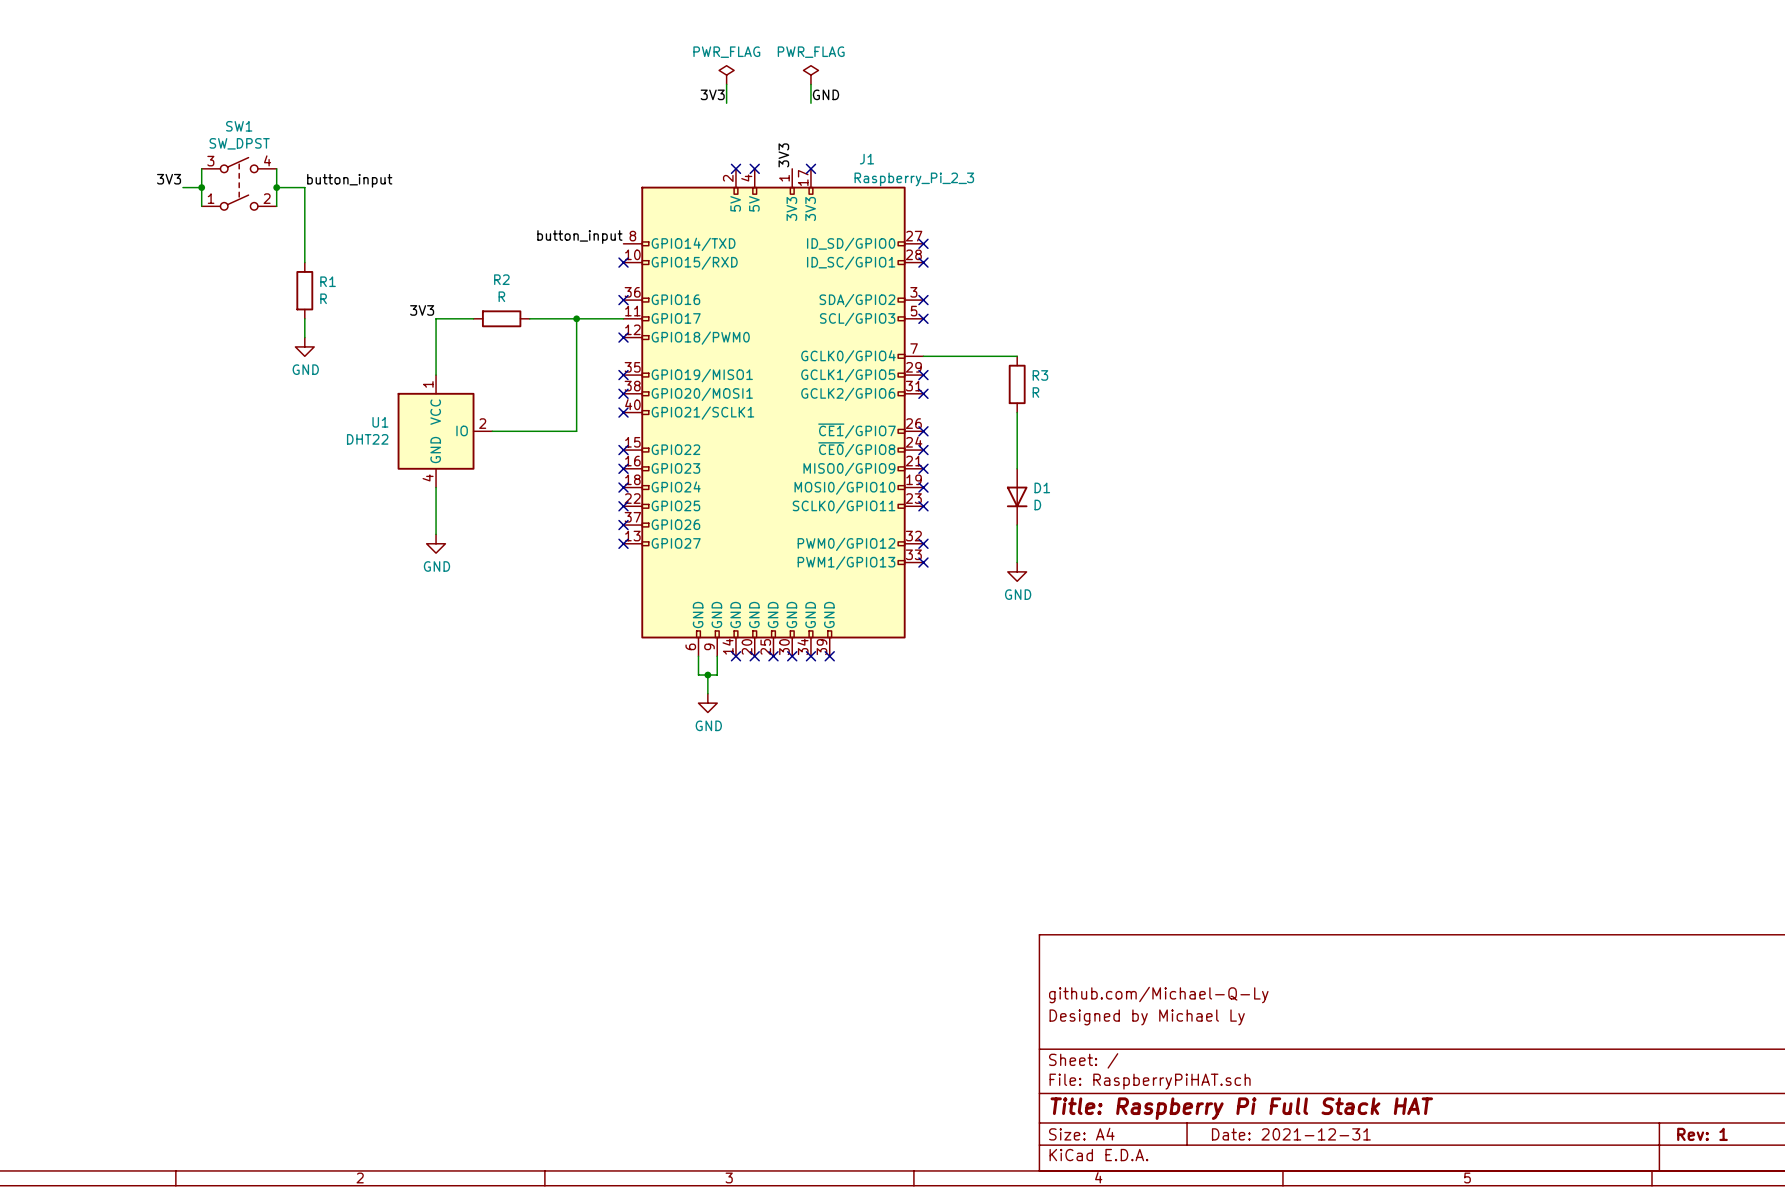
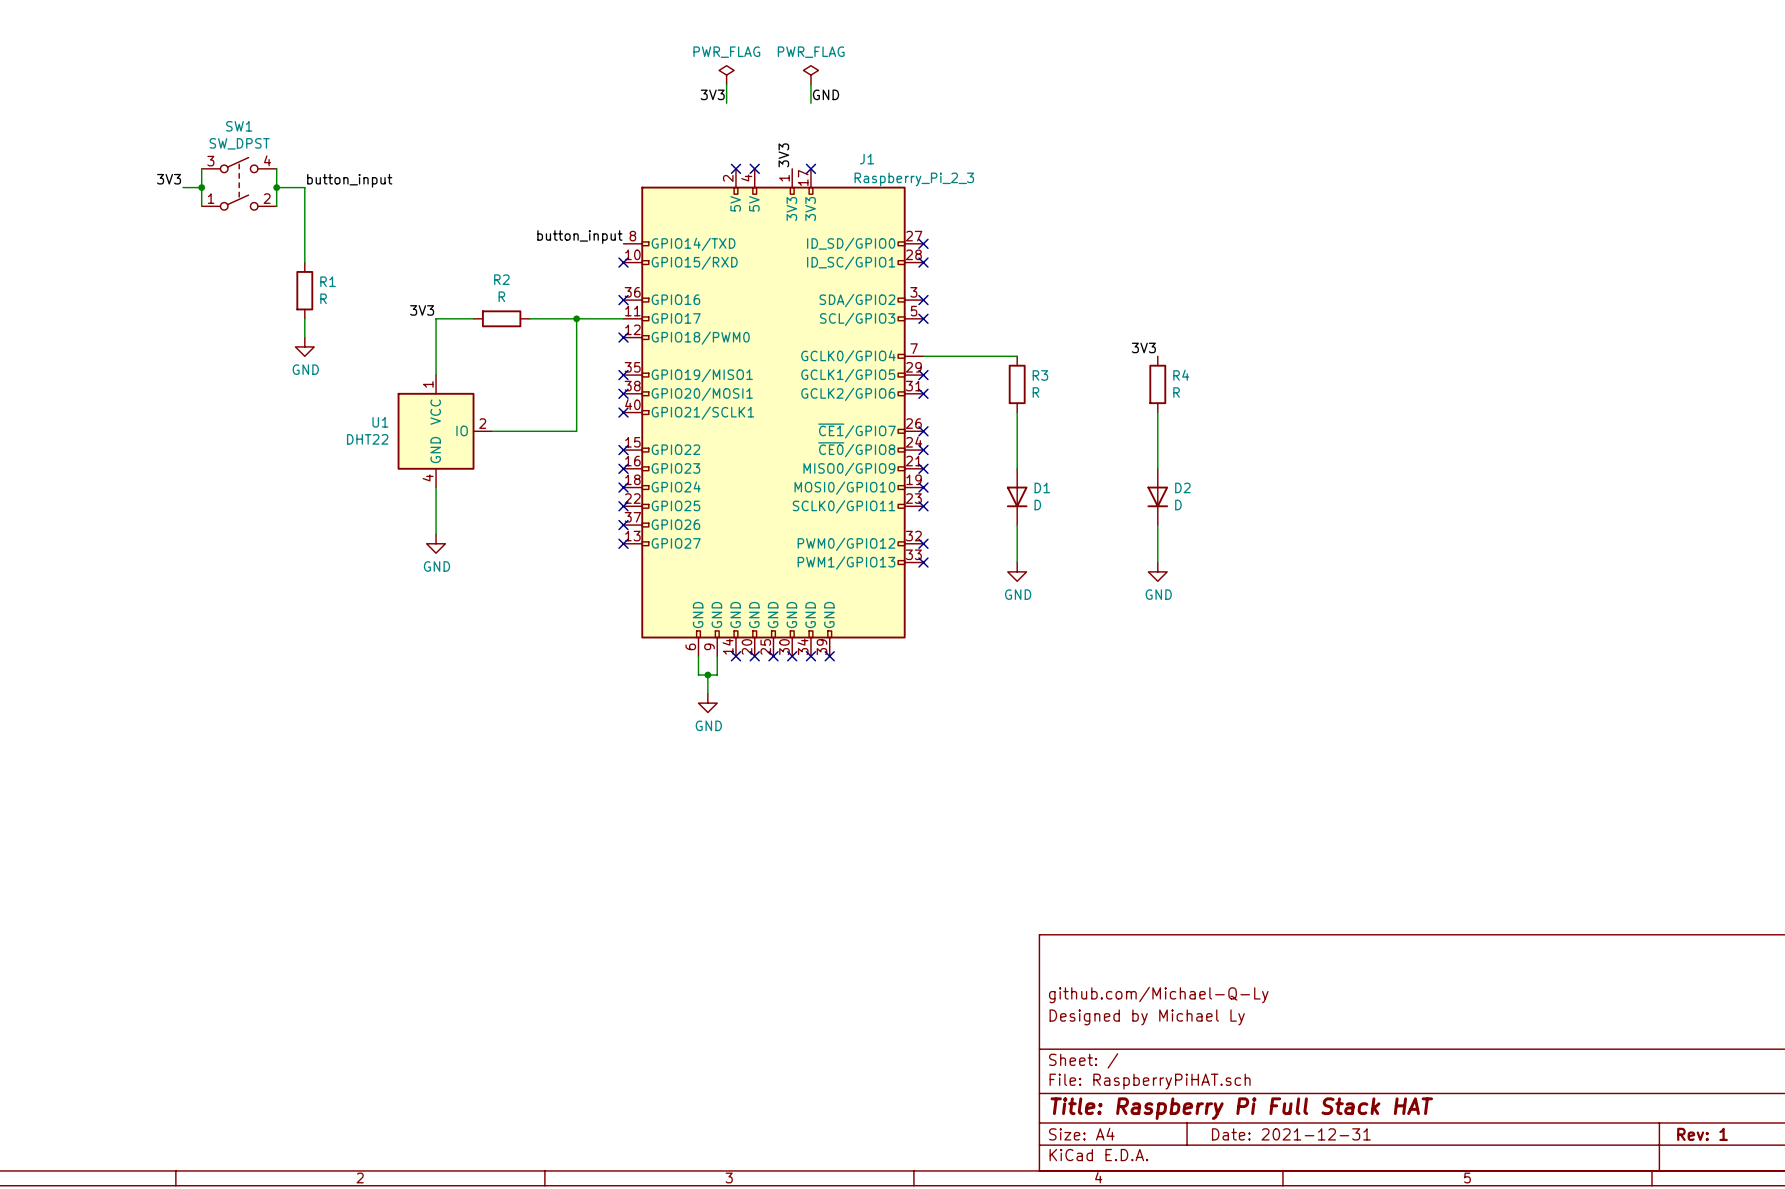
label: none -> 3V3 (1143, 347)
R4: none -> R (1157, 384)
wire: none -> (1157, 412) (1157, 468)
D2: none -> D (1157, 496)
wire: none -> (1157, 525) (1157, 562)
power symbol: none -> GND (1157, 571)

